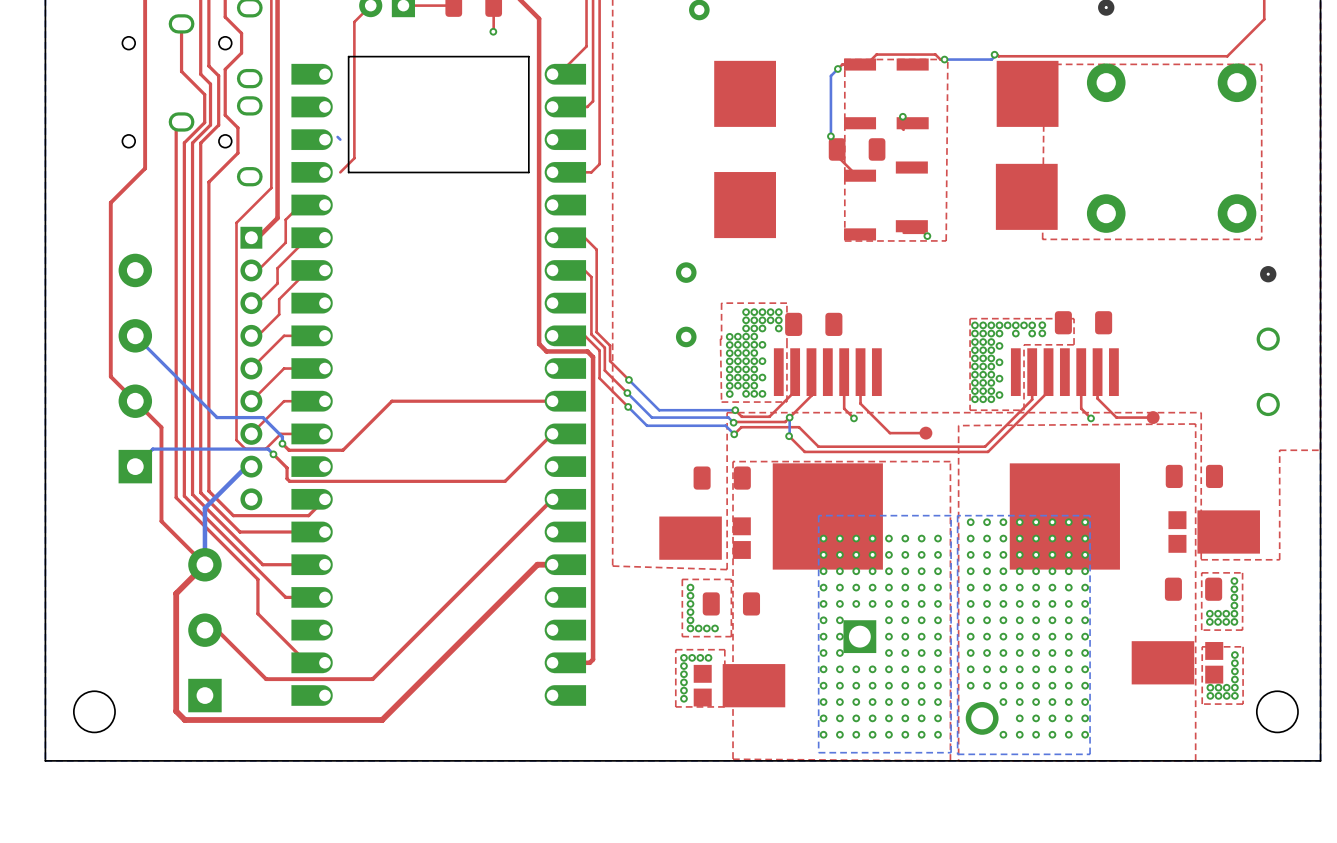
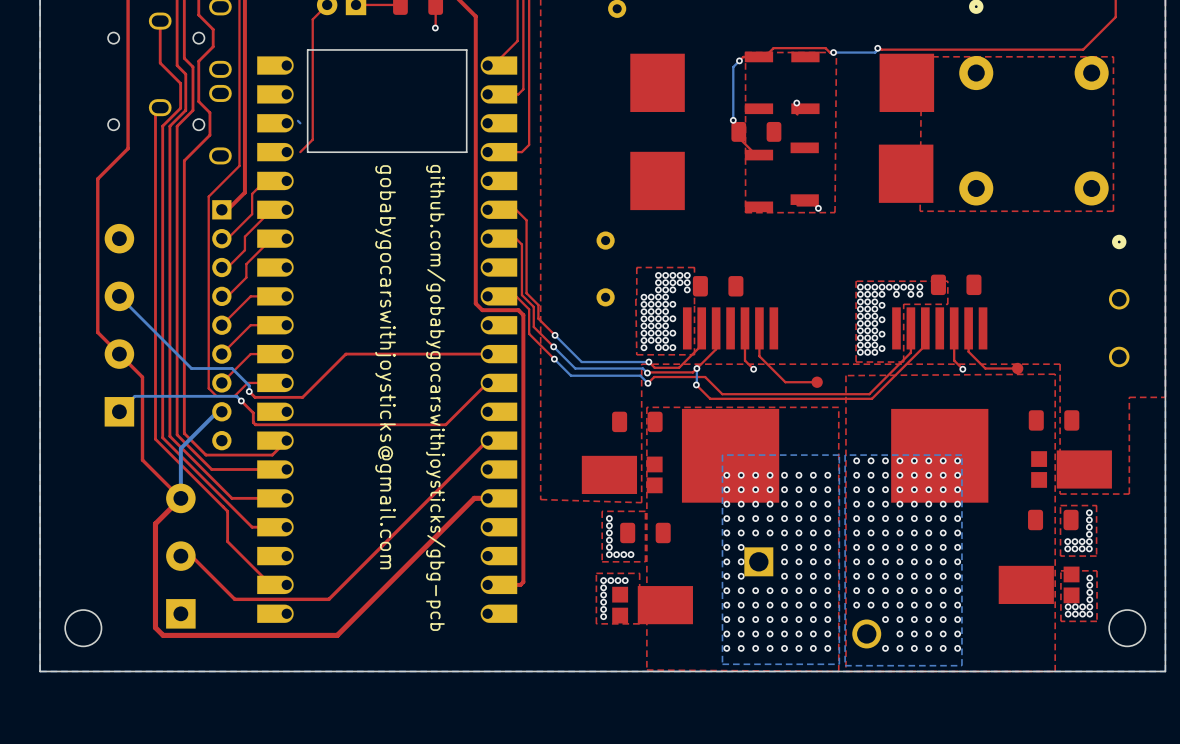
text: none -> gobabygocarswithjoysticks@gmail.com (385, 367)
text: none -> github.com/gobabygocarswithjoysticks/gbg-pcb (435, 397)

